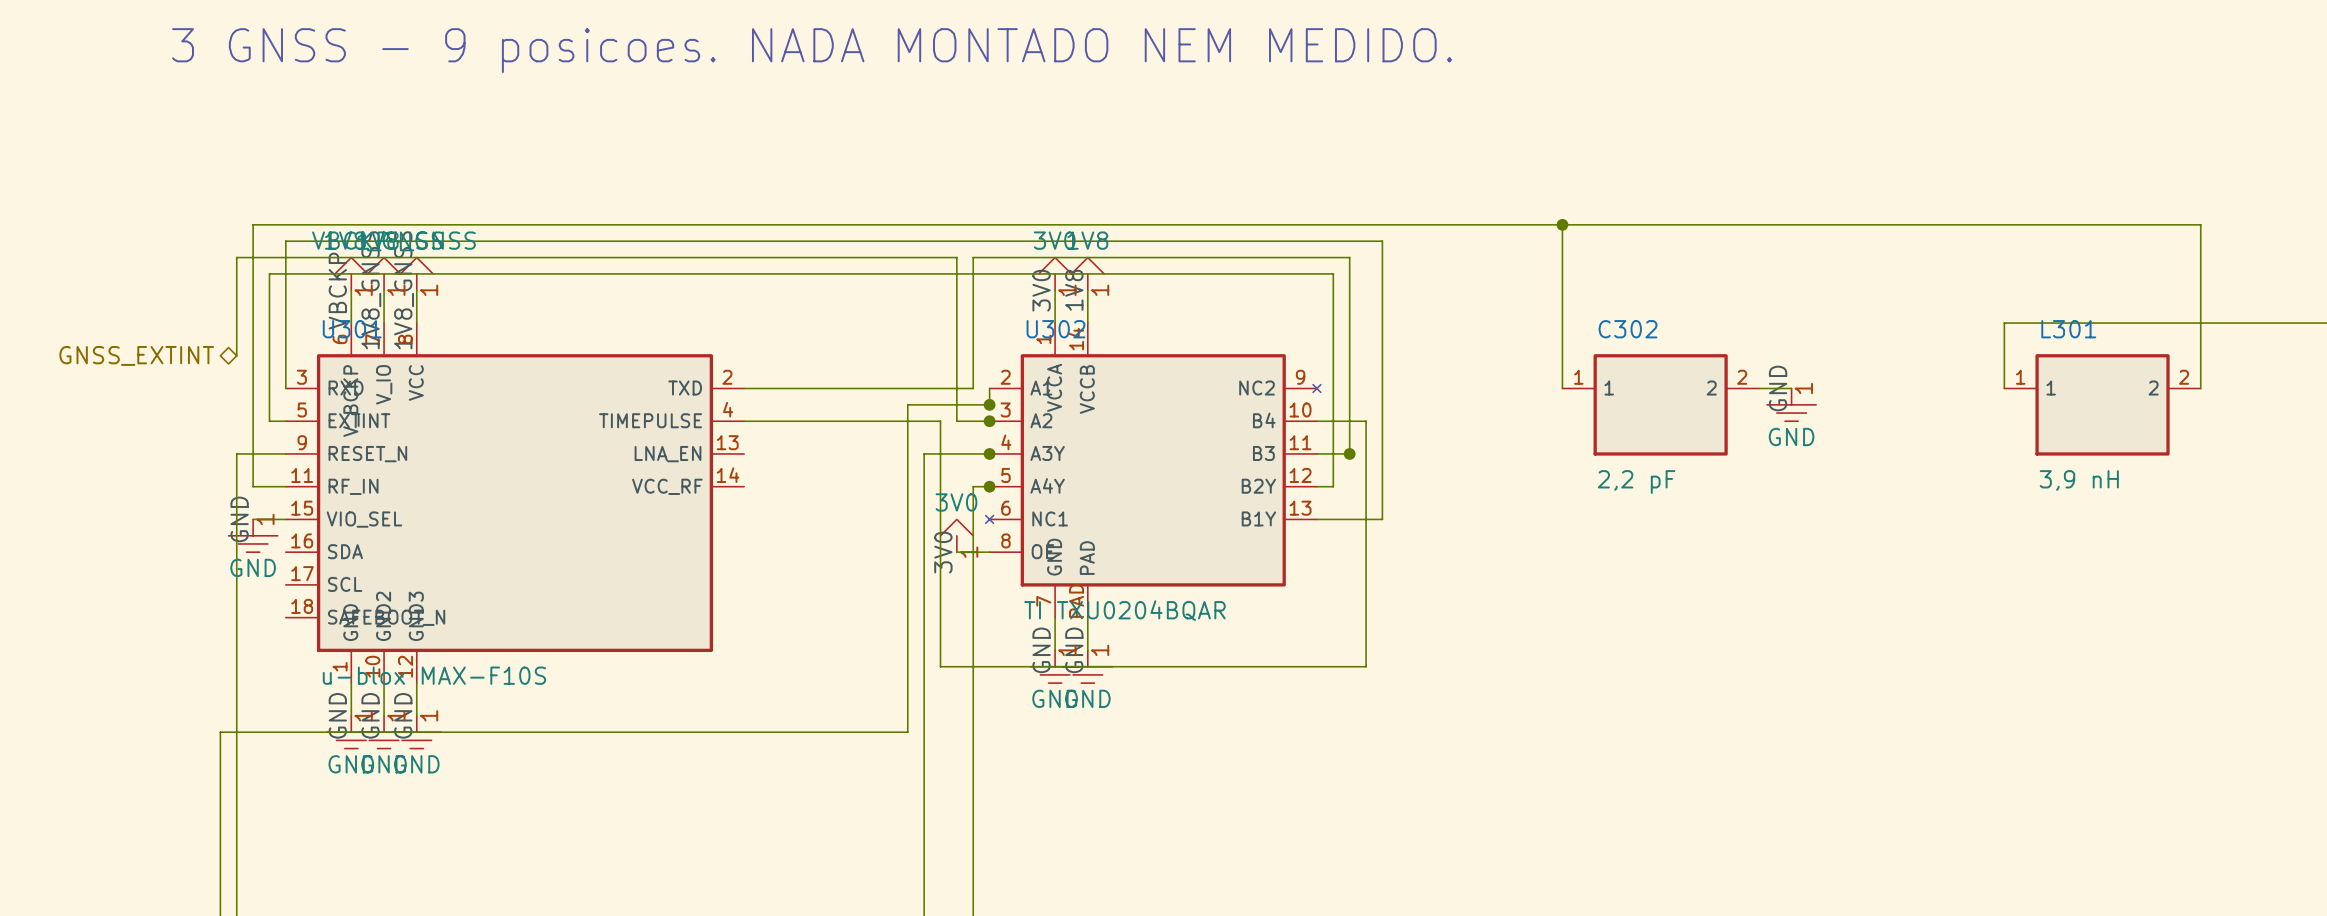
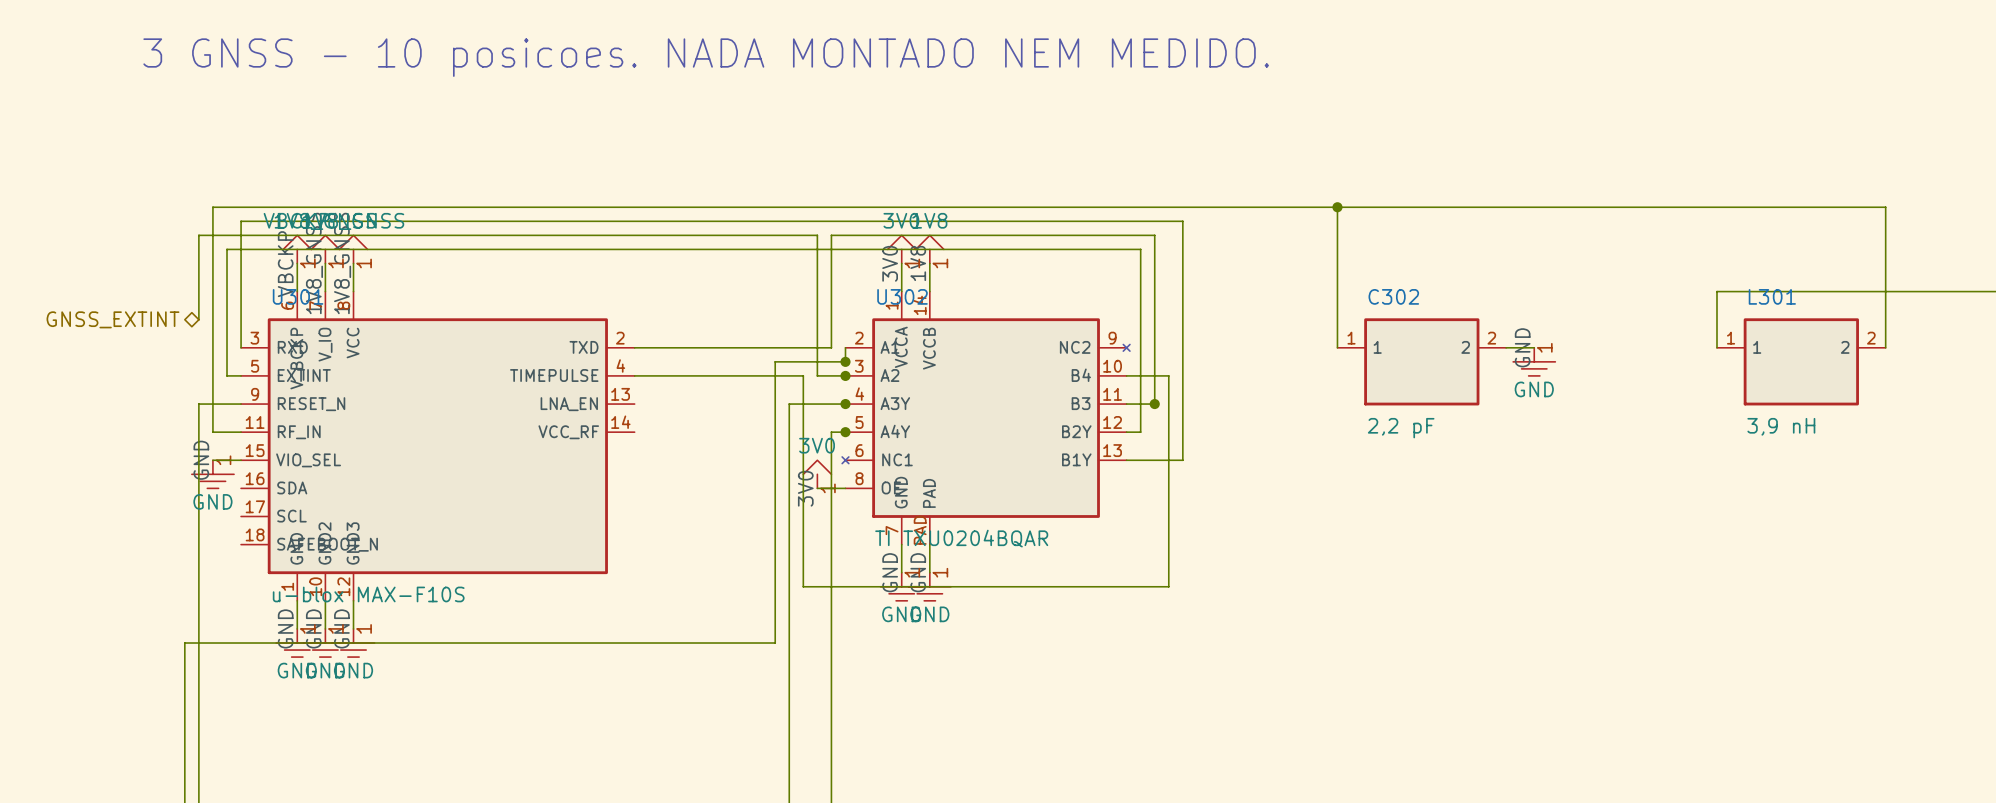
text: 3 GNSS - 9 posicoes. NADA MONTADO NEM MEDIDO. (812, 50) -> 3 GNSS - 10 posicoes. NADA MONTADO NEM MEDIDO. (706, 57)

